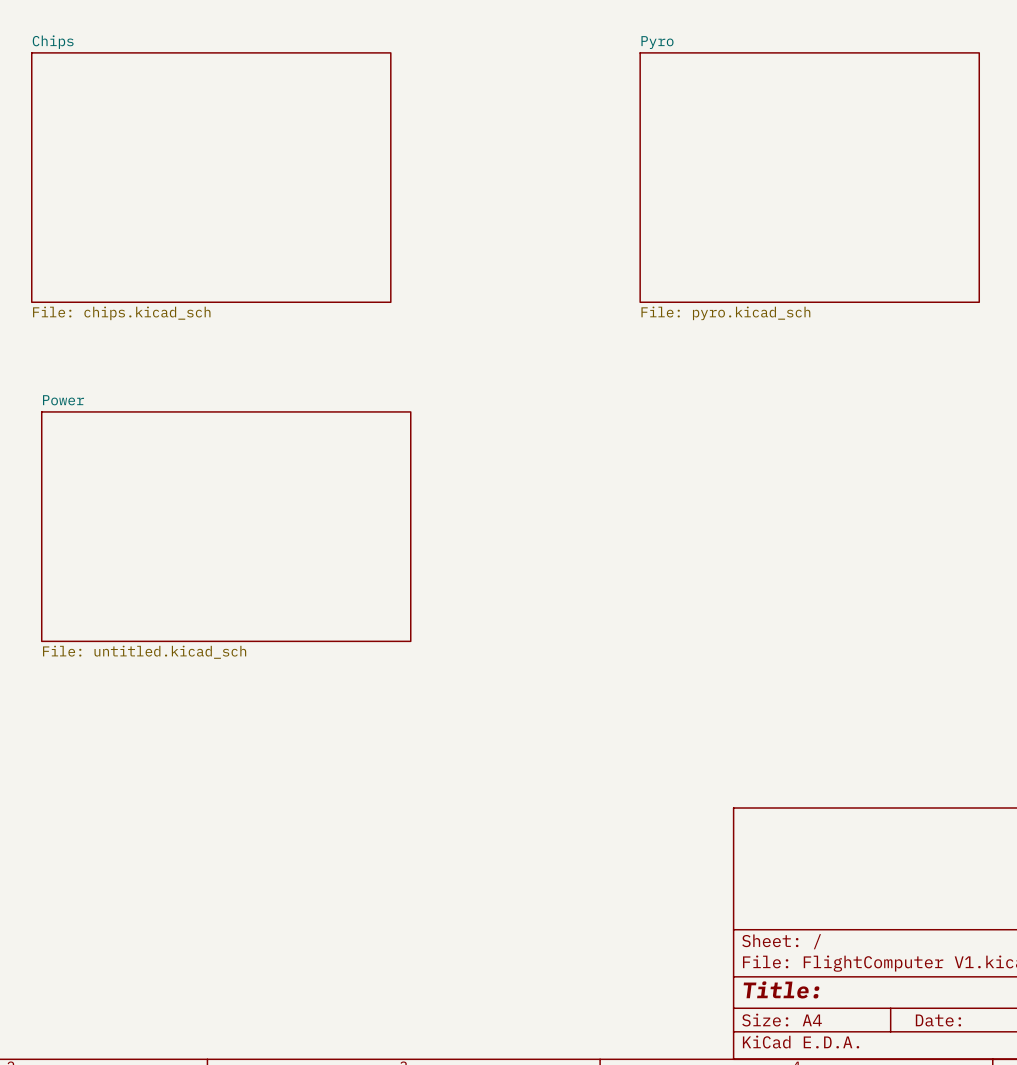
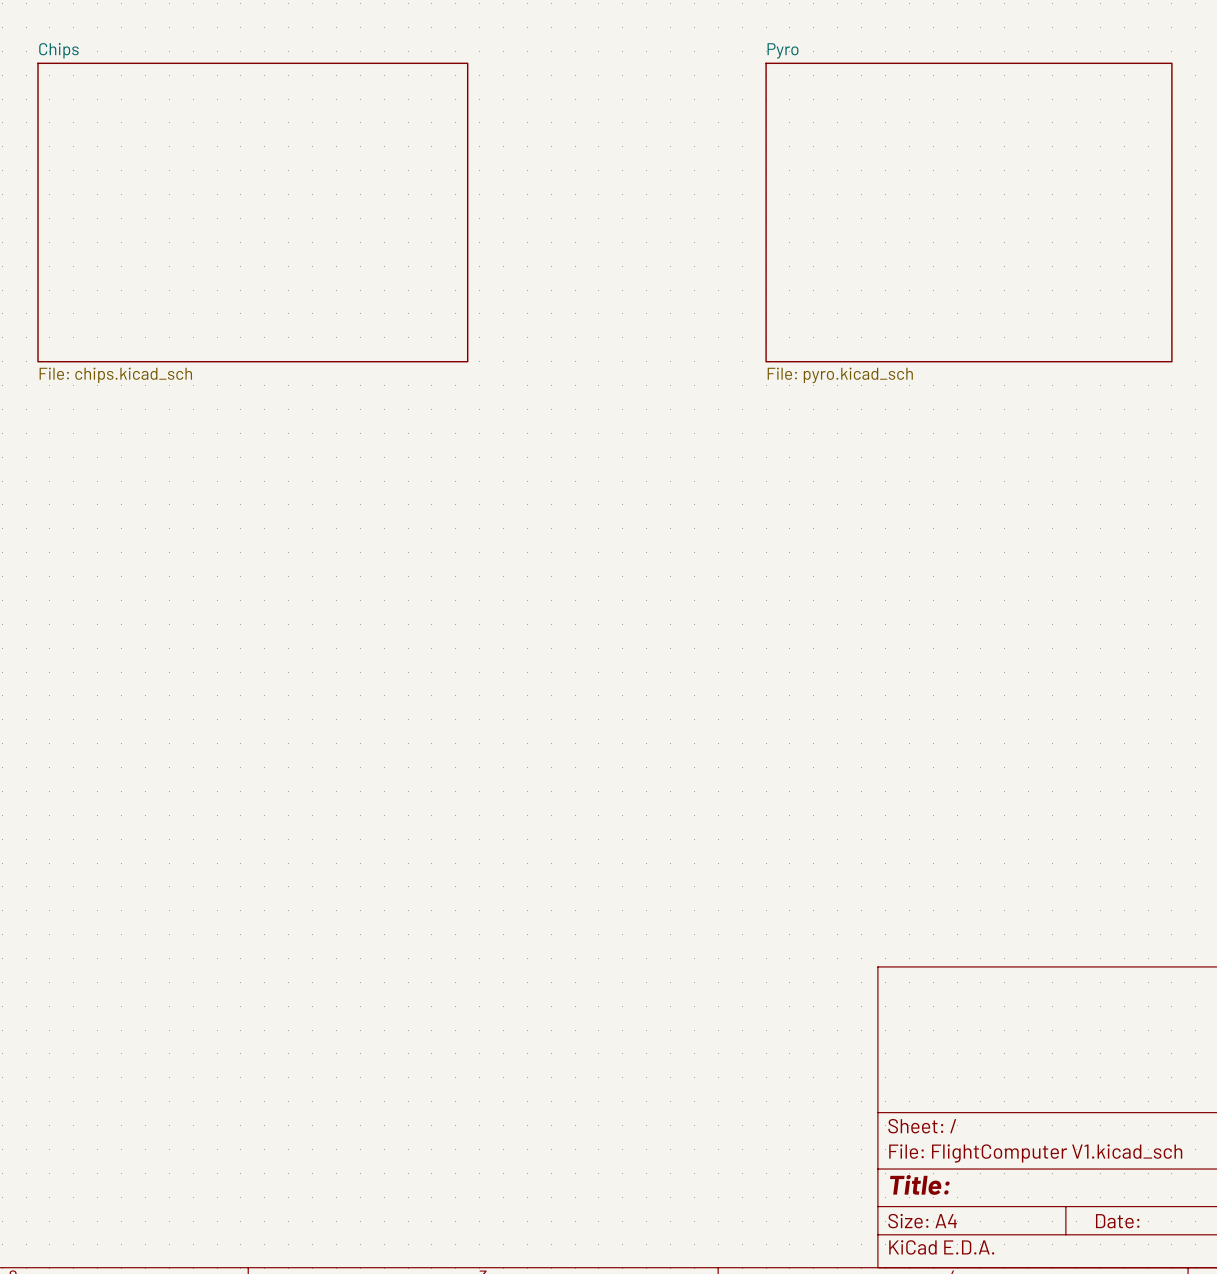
sheet Power: File: untitled.kicad_sch (226, 526) -> none

